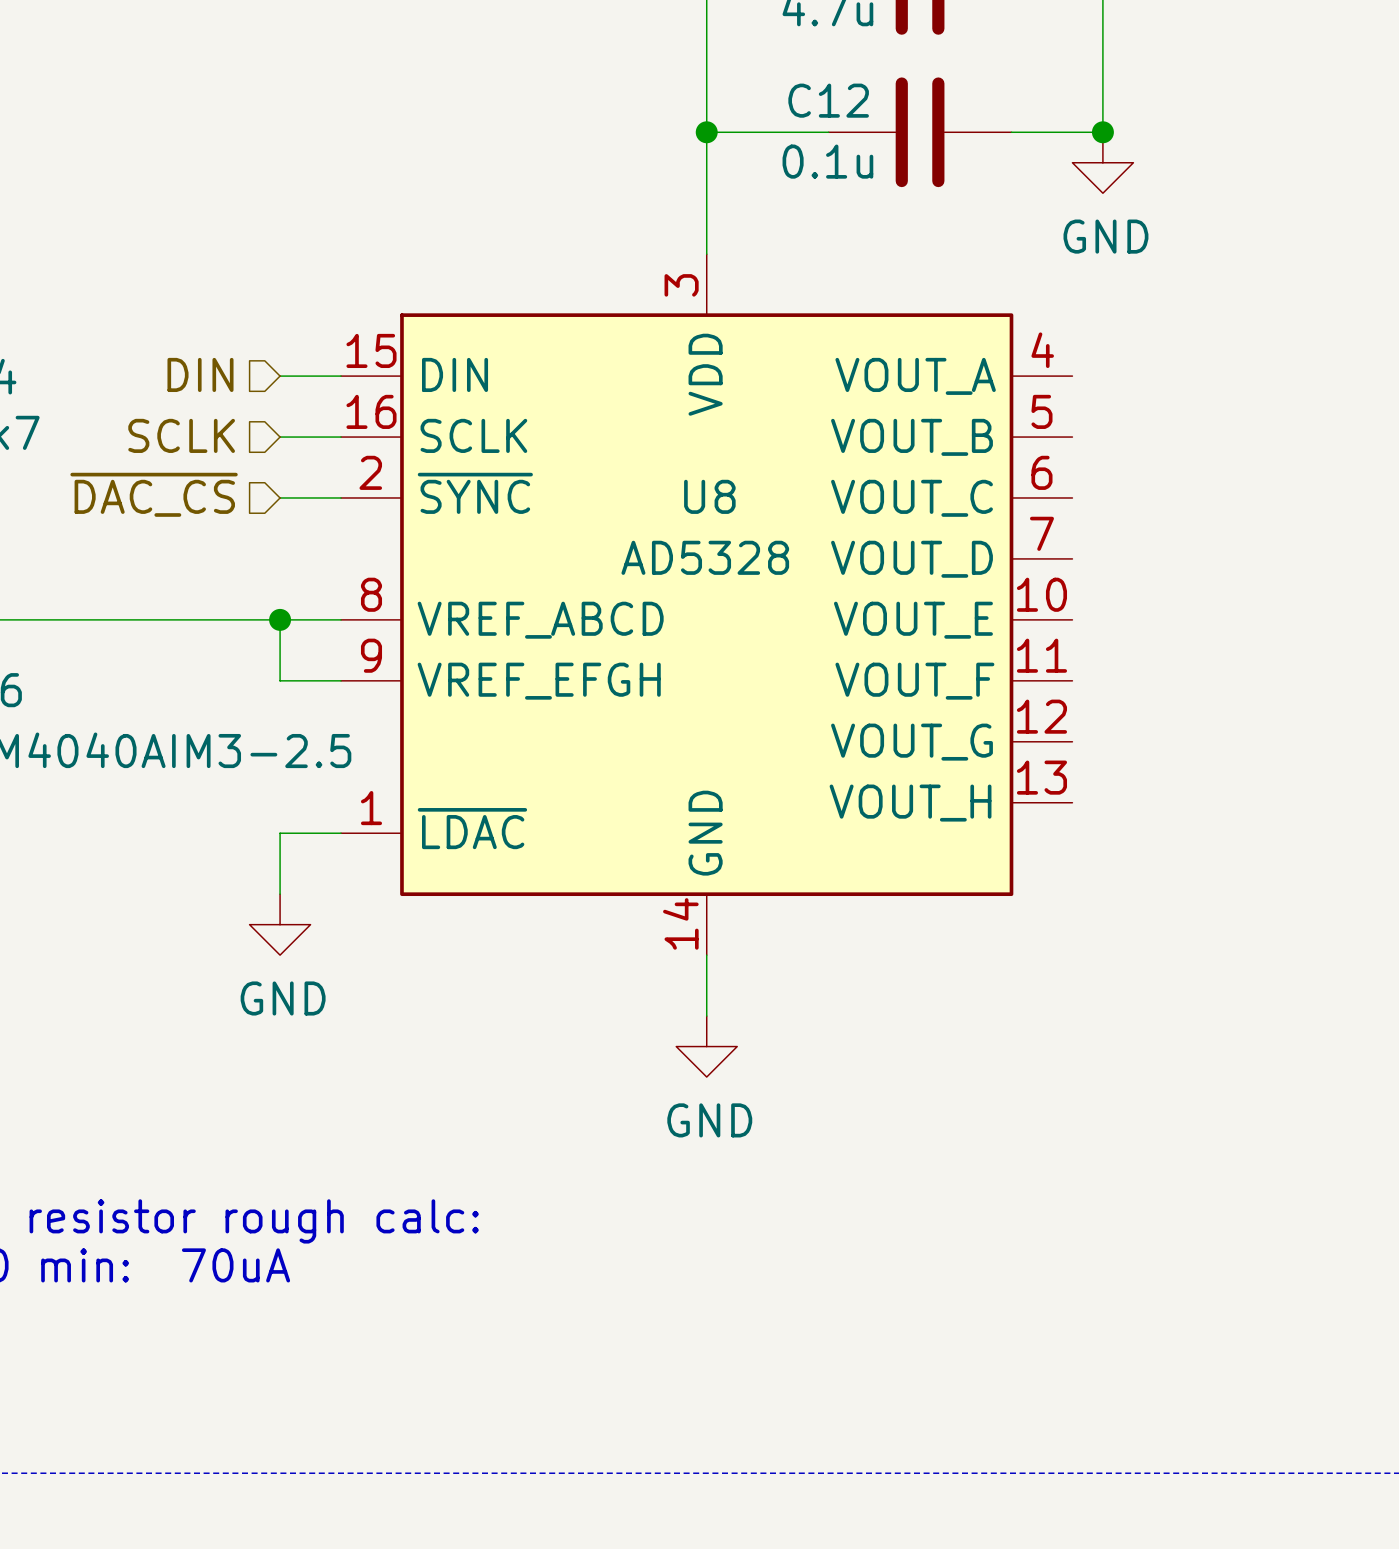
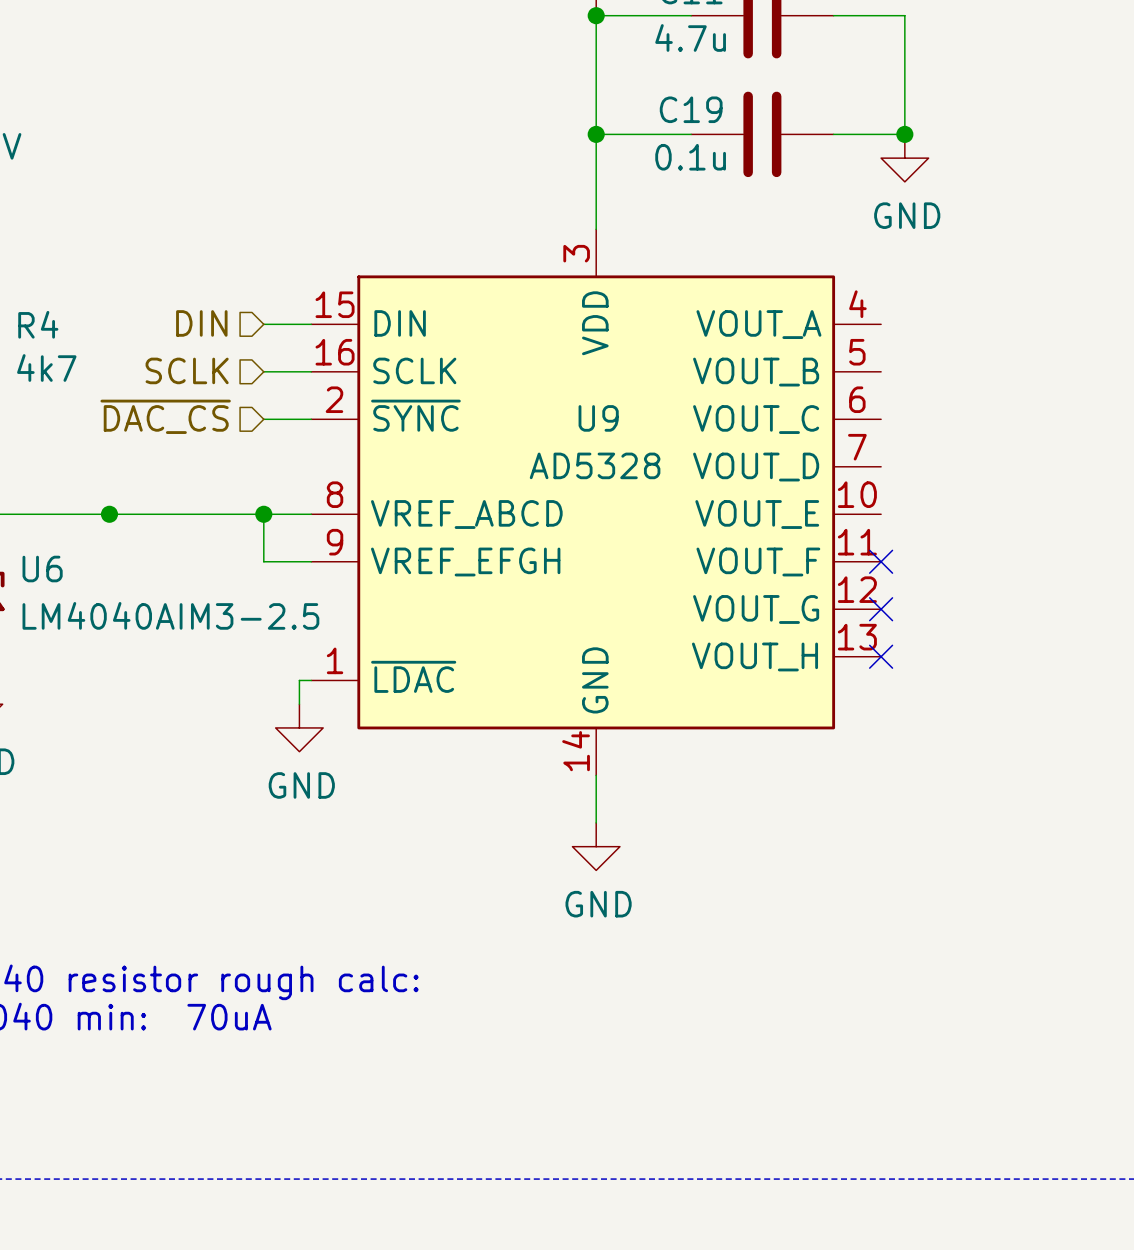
C12 name: C12 (828, 100) -> C19 (691, 109)
U8 name: U8 (709, 496) -> U9 (598, 418)
junction: none -> (109, 514)
no-connect mark: none -> (881, 561)
no-connect mark: none -> (881, 609)
no-connect mark: none -> (881, 656)
wire: (325, 833) (280, 833) (280, 894) -> (299, 680) (299, 704)
power symbol position: GND (280, 924) -> GND (299, 727)

